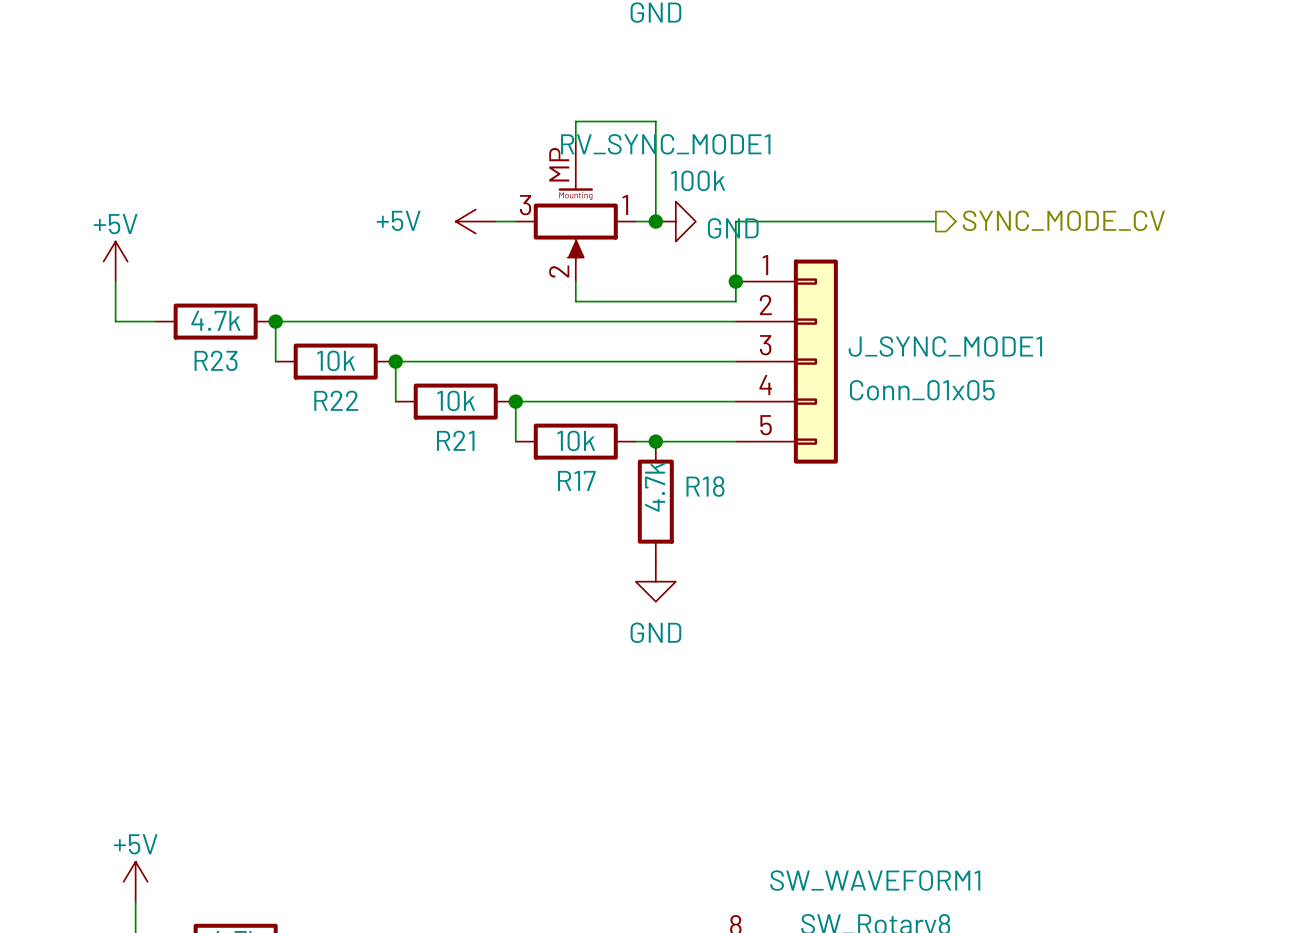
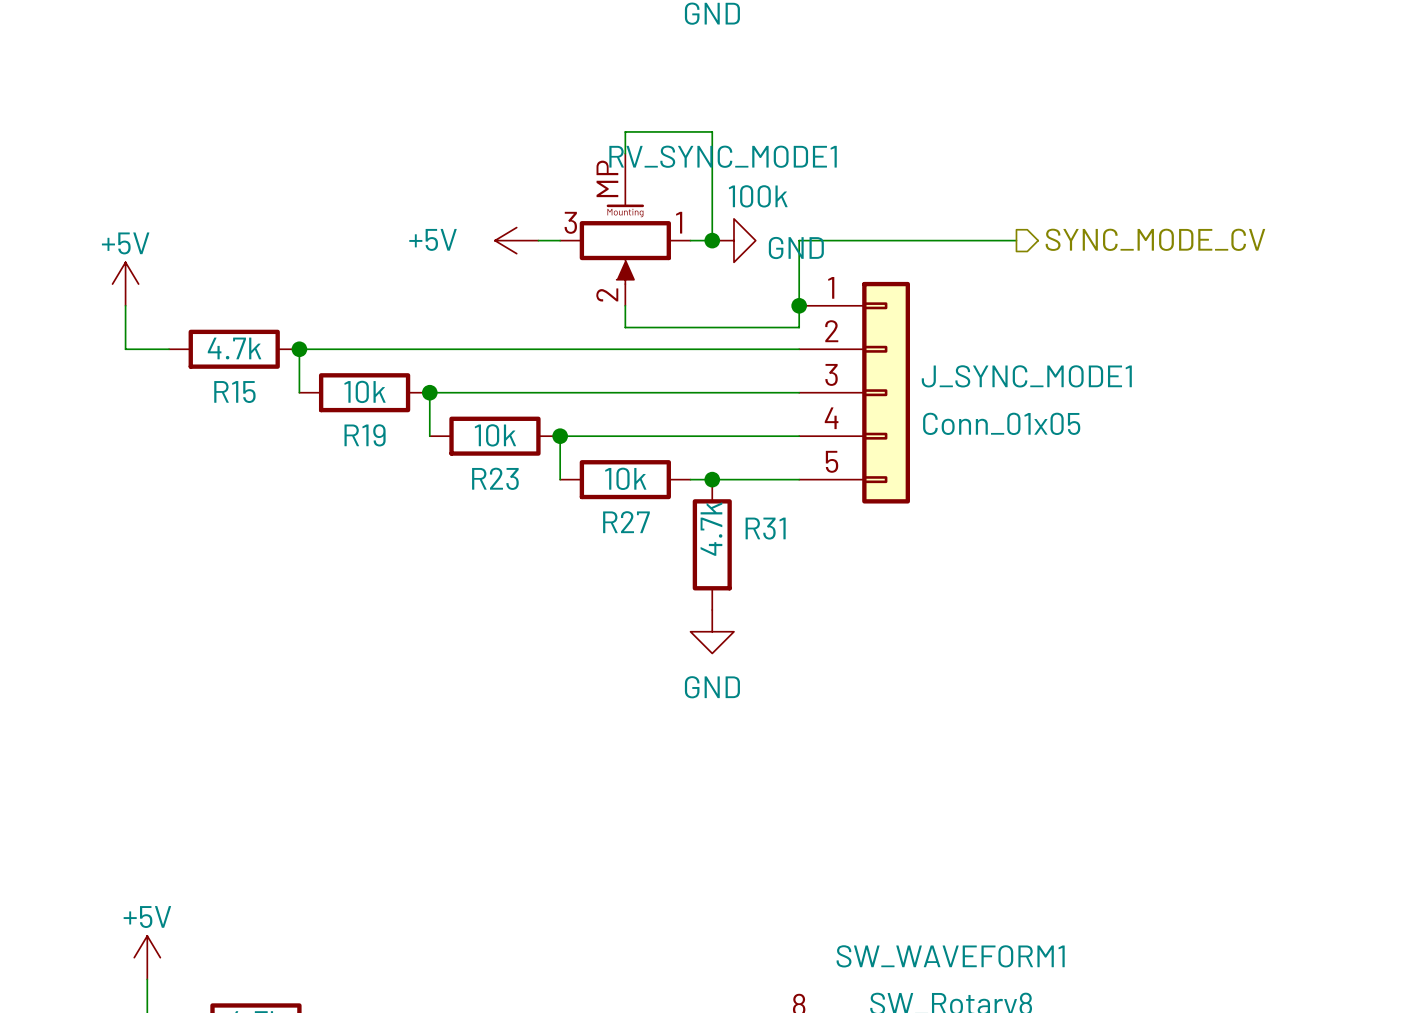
R23 name: R23 (216, 360) -> R15 (234, 392)
R22 name: R22 (336, 400) -> R19 (365, 435)
R21 name: R21 (455, 440) -> R23 (495, 478)
R17 name: R17 (576, 480) -> R27 (626, 522)
R18 name: R18 (705, 486) -> R31 (765, 528)

